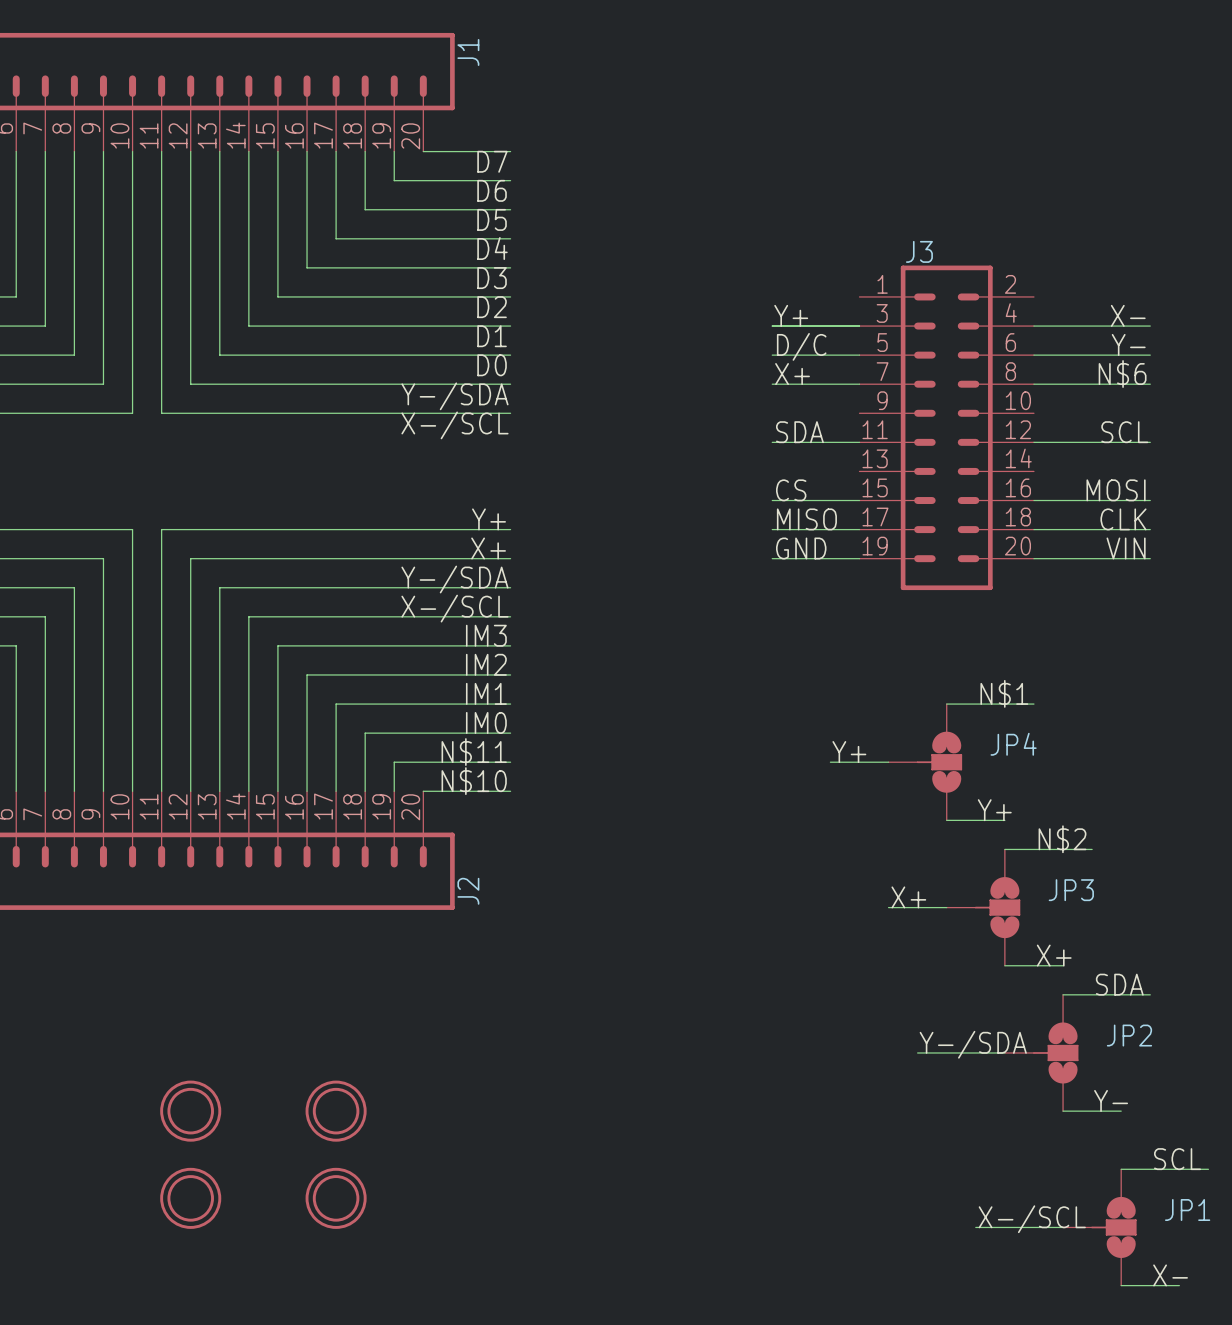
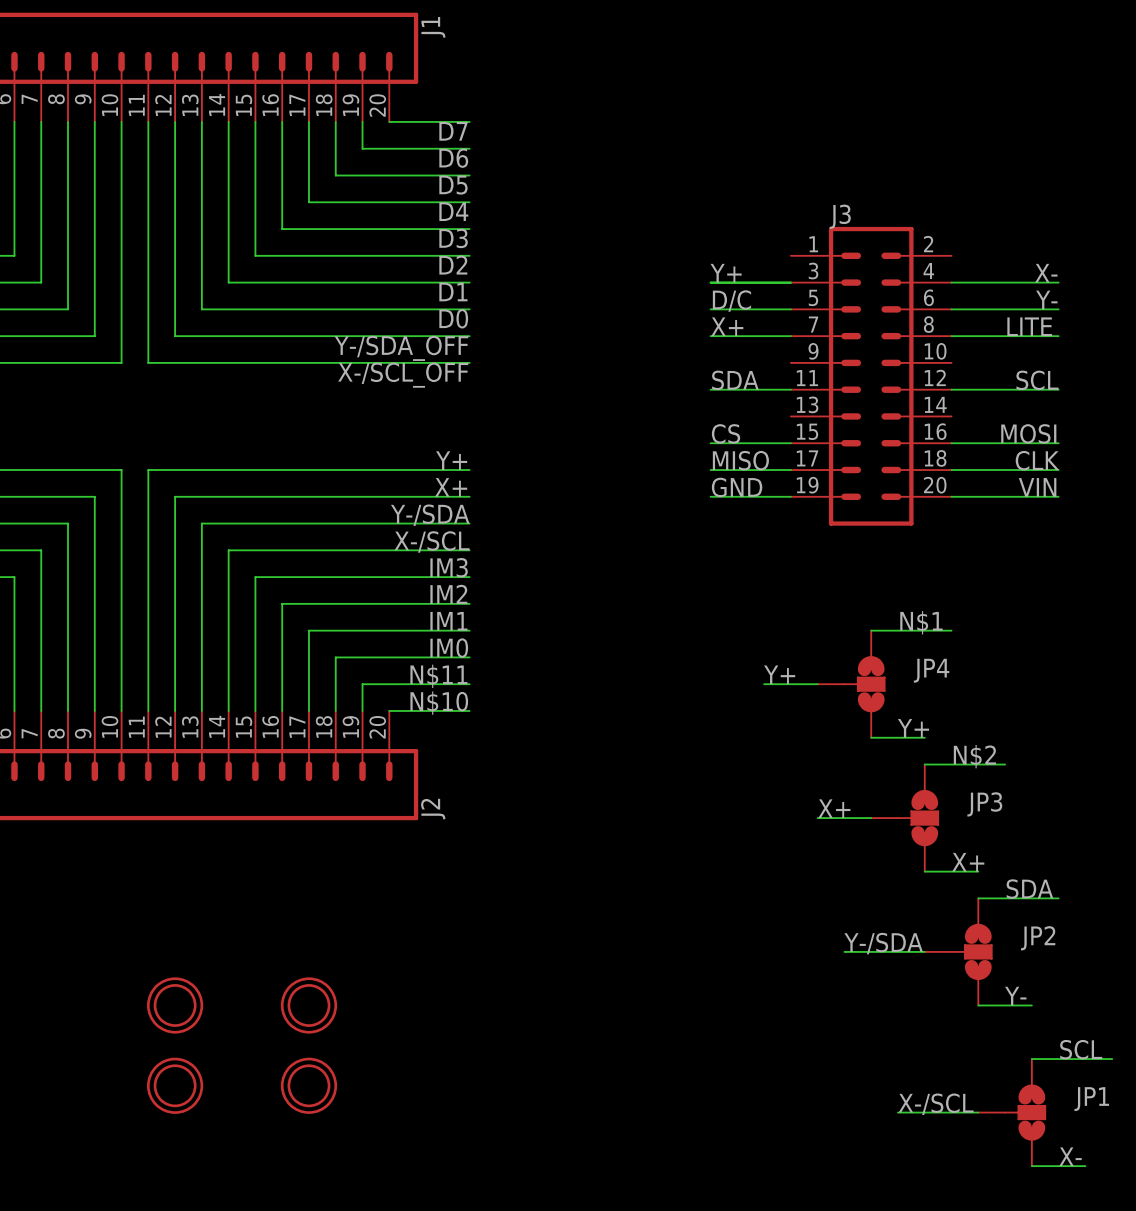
label: none -> LITE (1029, 326)
label: N$6 (1122, 374) -> none
label: Y-/SDA (454, 396) -> Y-/SDA_OFF (401, 348)
label: X-/SCL (454, 425) -> X-/SCL_OFF (403, 375)

